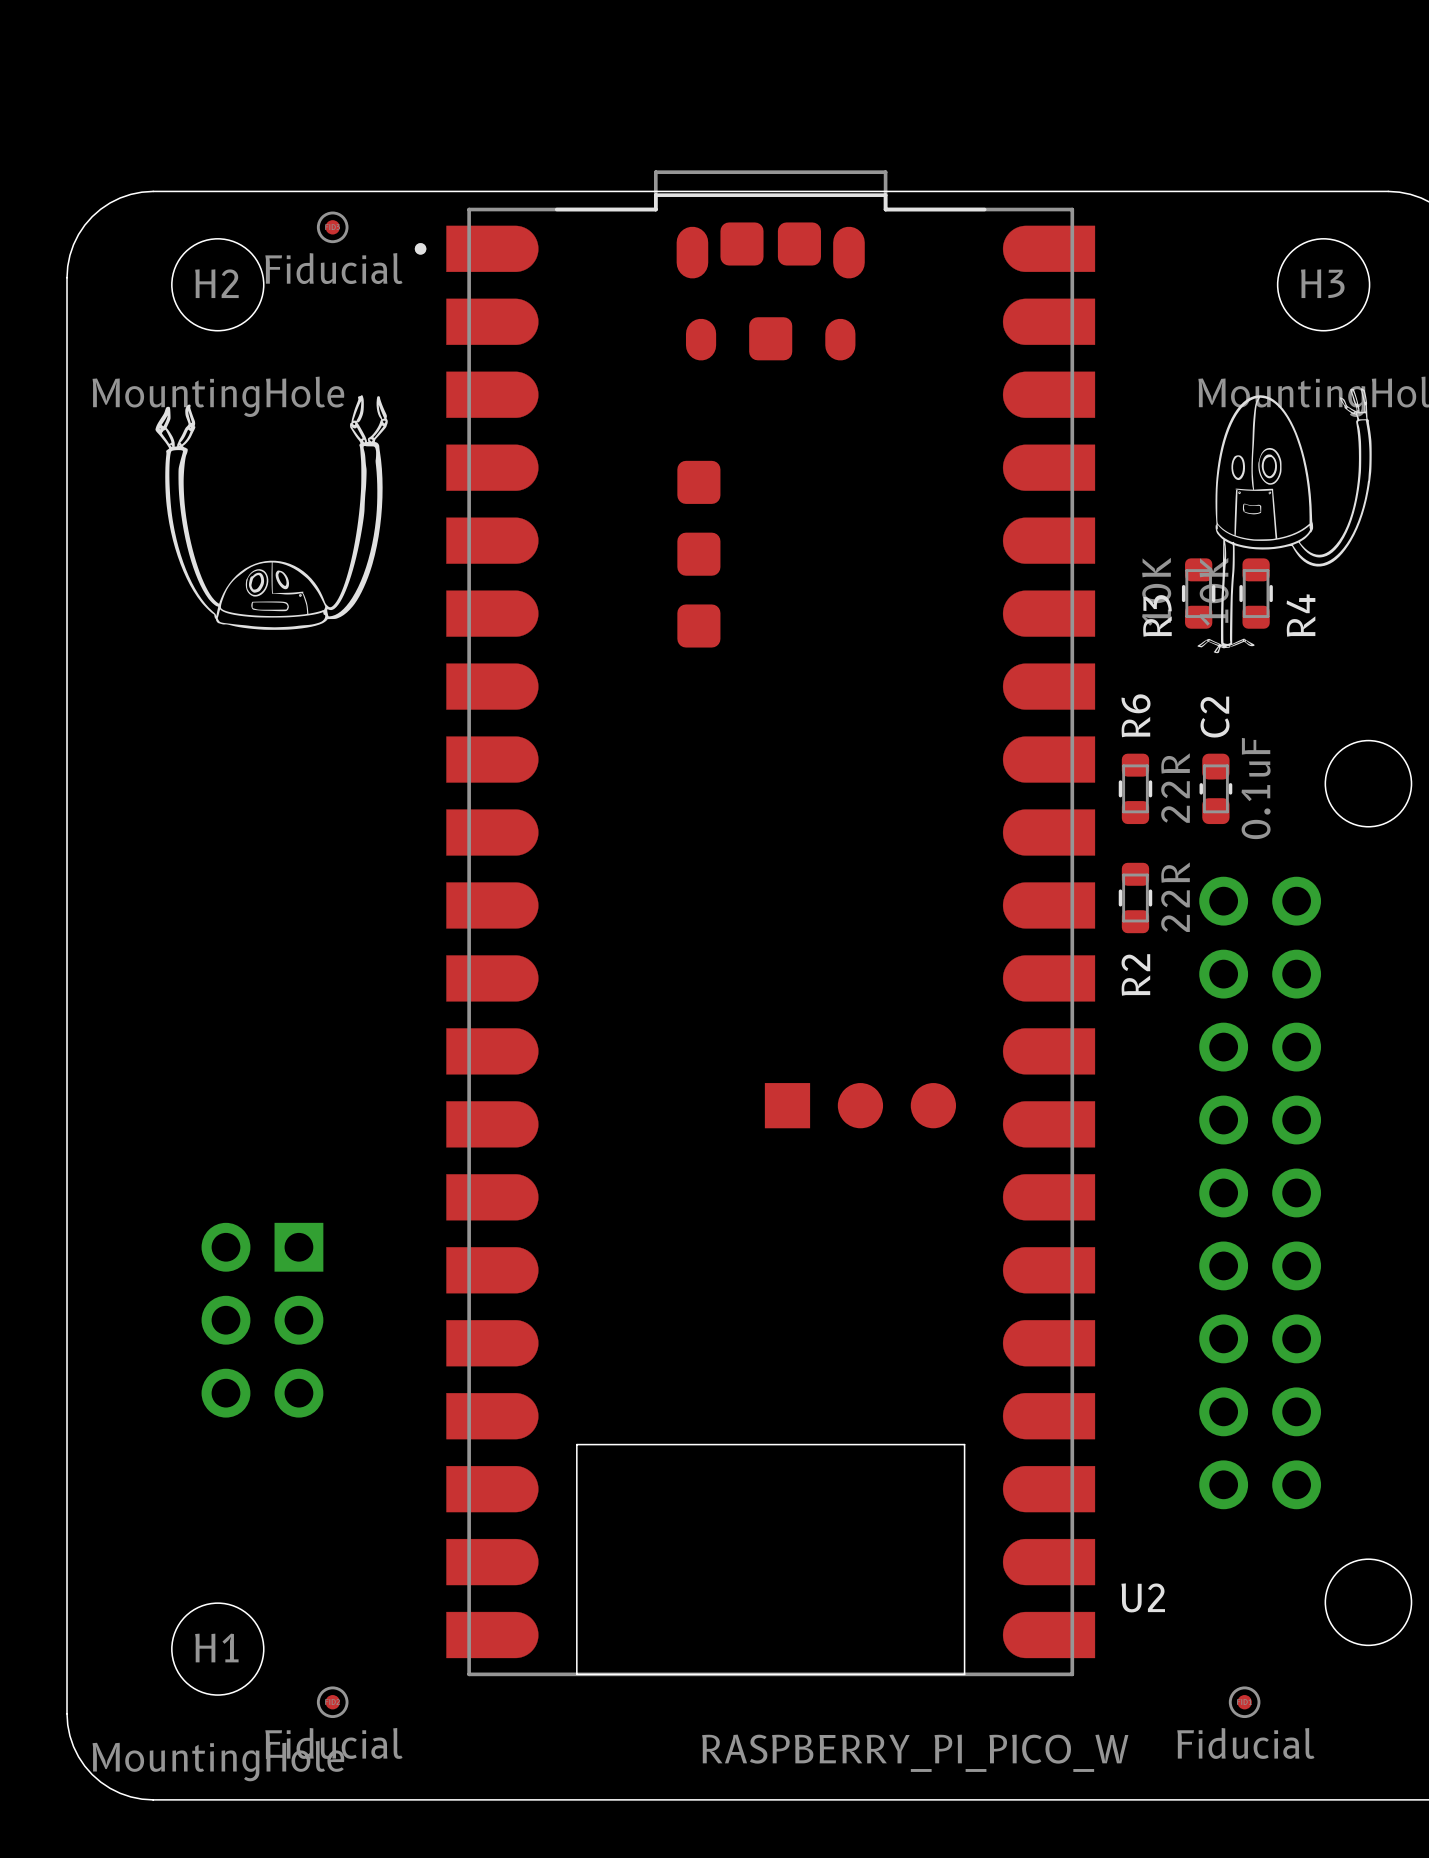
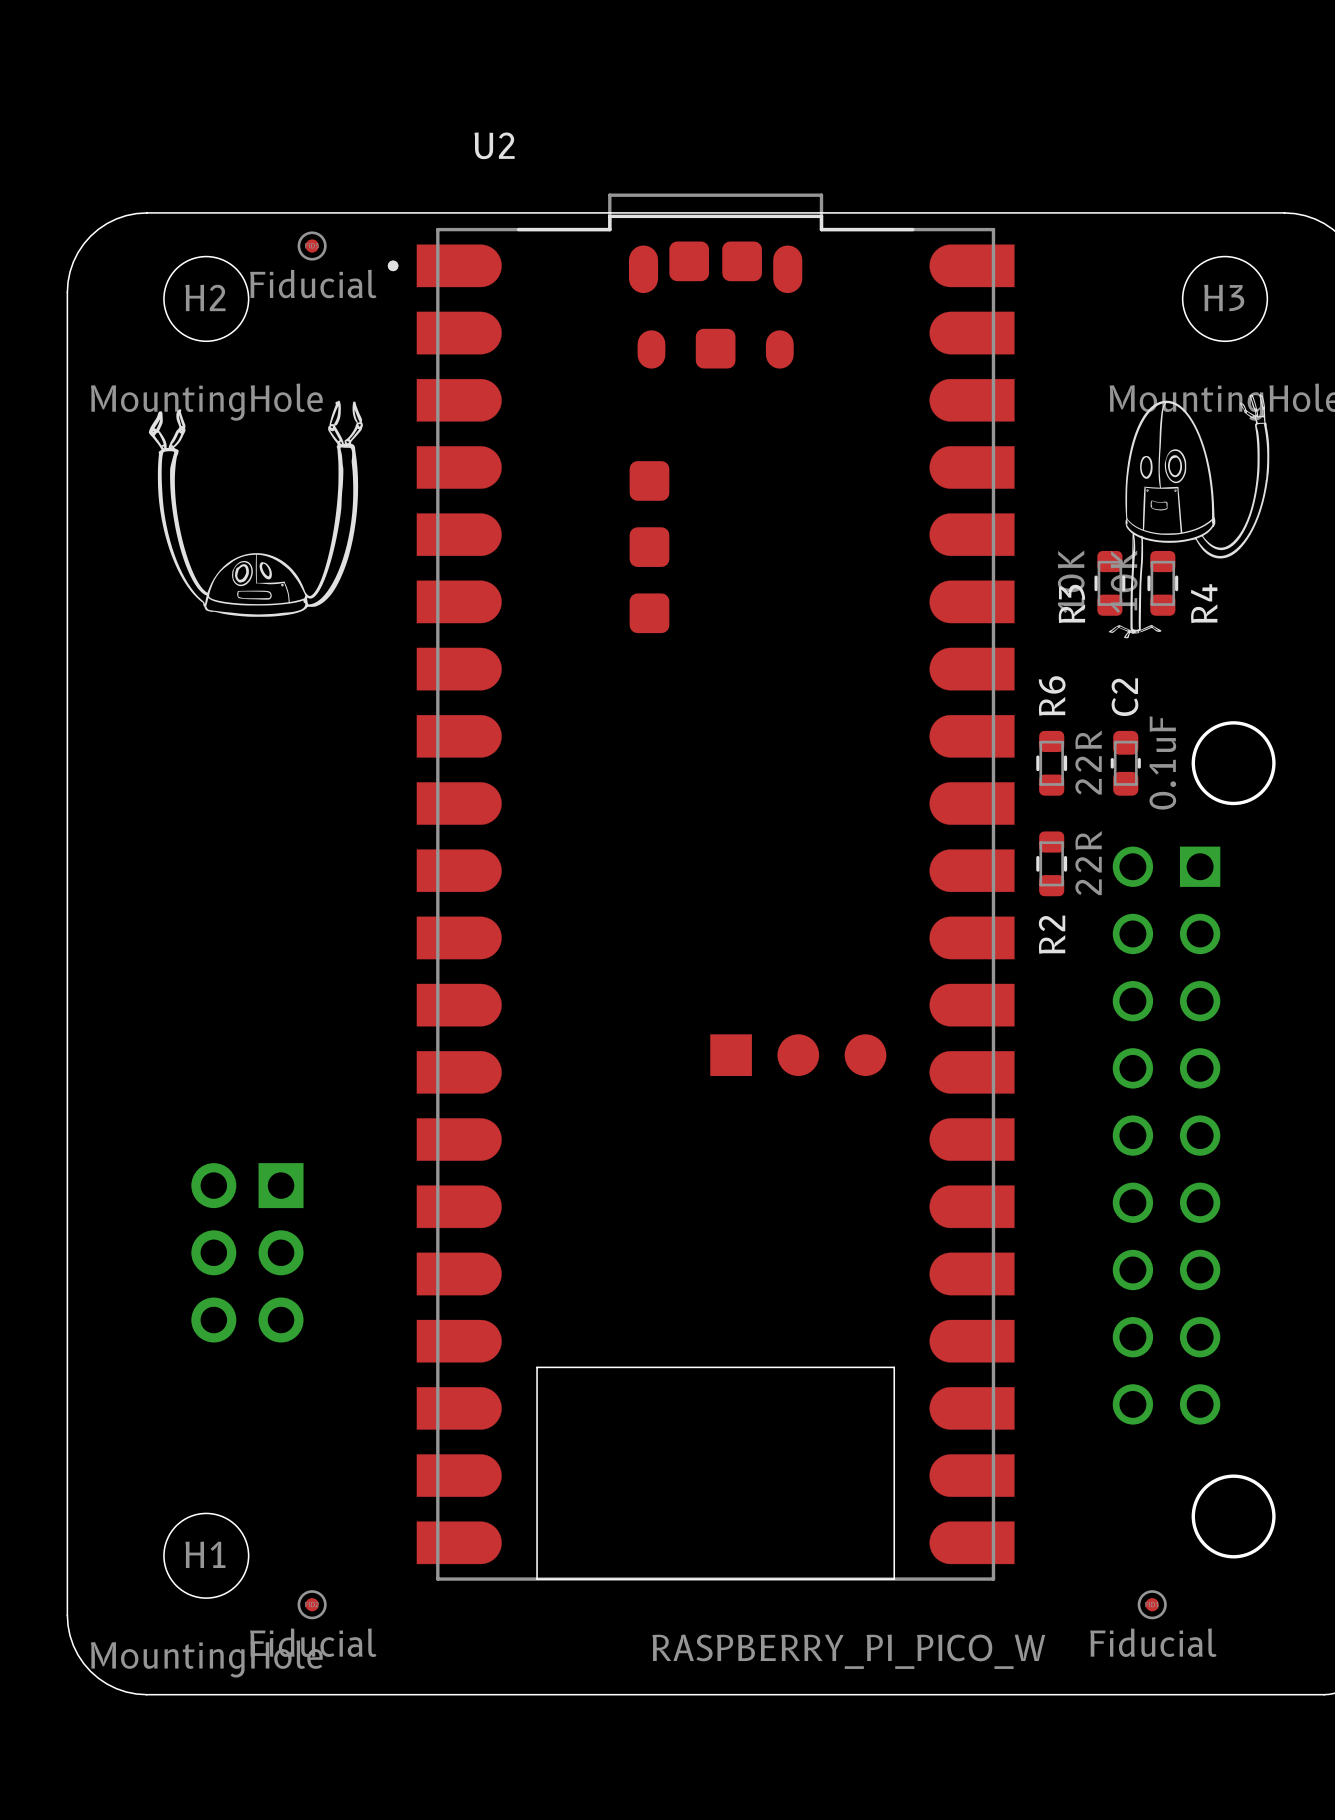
part footprint: [1199, 739, 1413, 1647] -> [1112, 721, 1276, 1559]
U2 name position: U2 (1143, 1597) -> U2 (494, 145)

